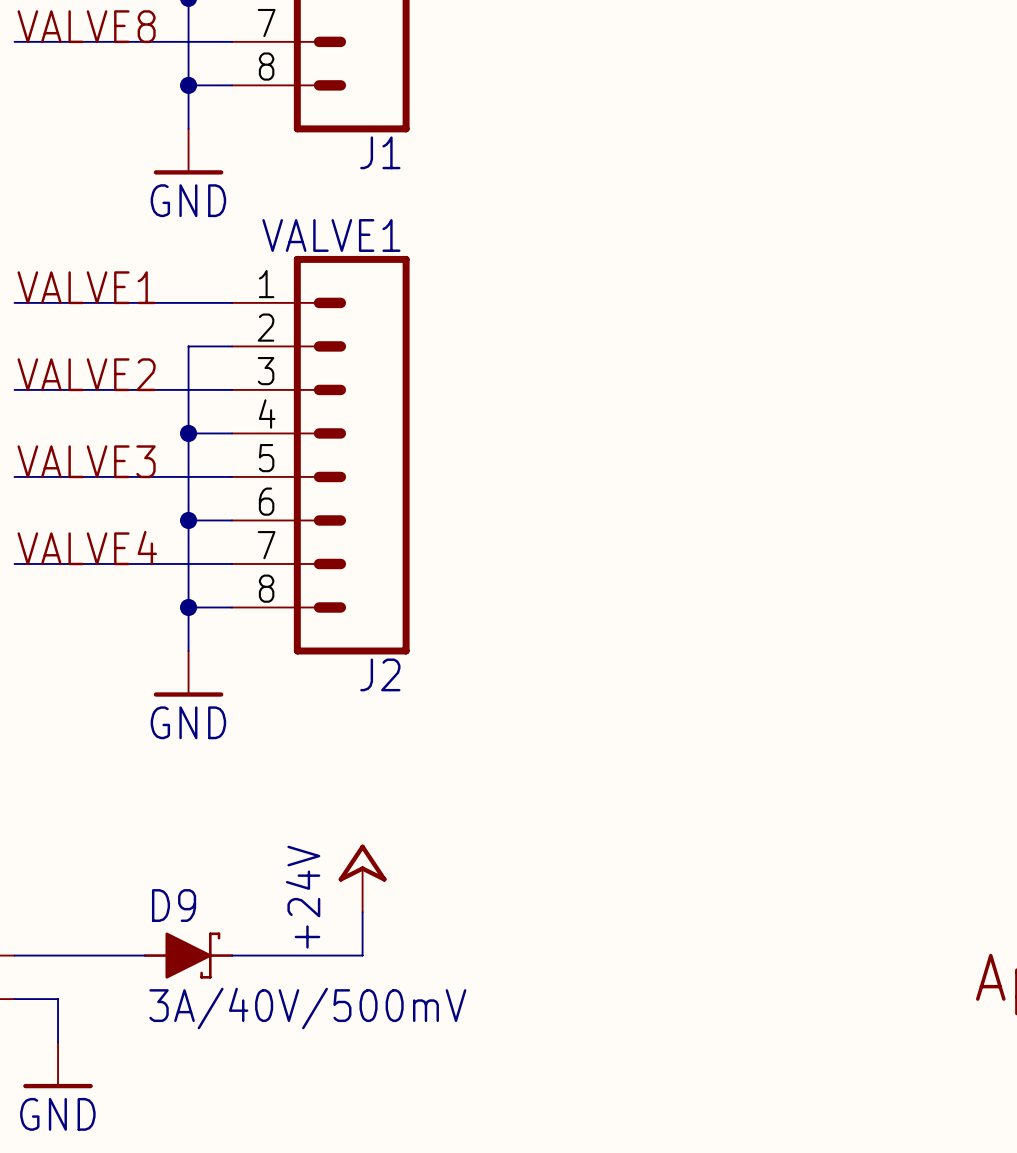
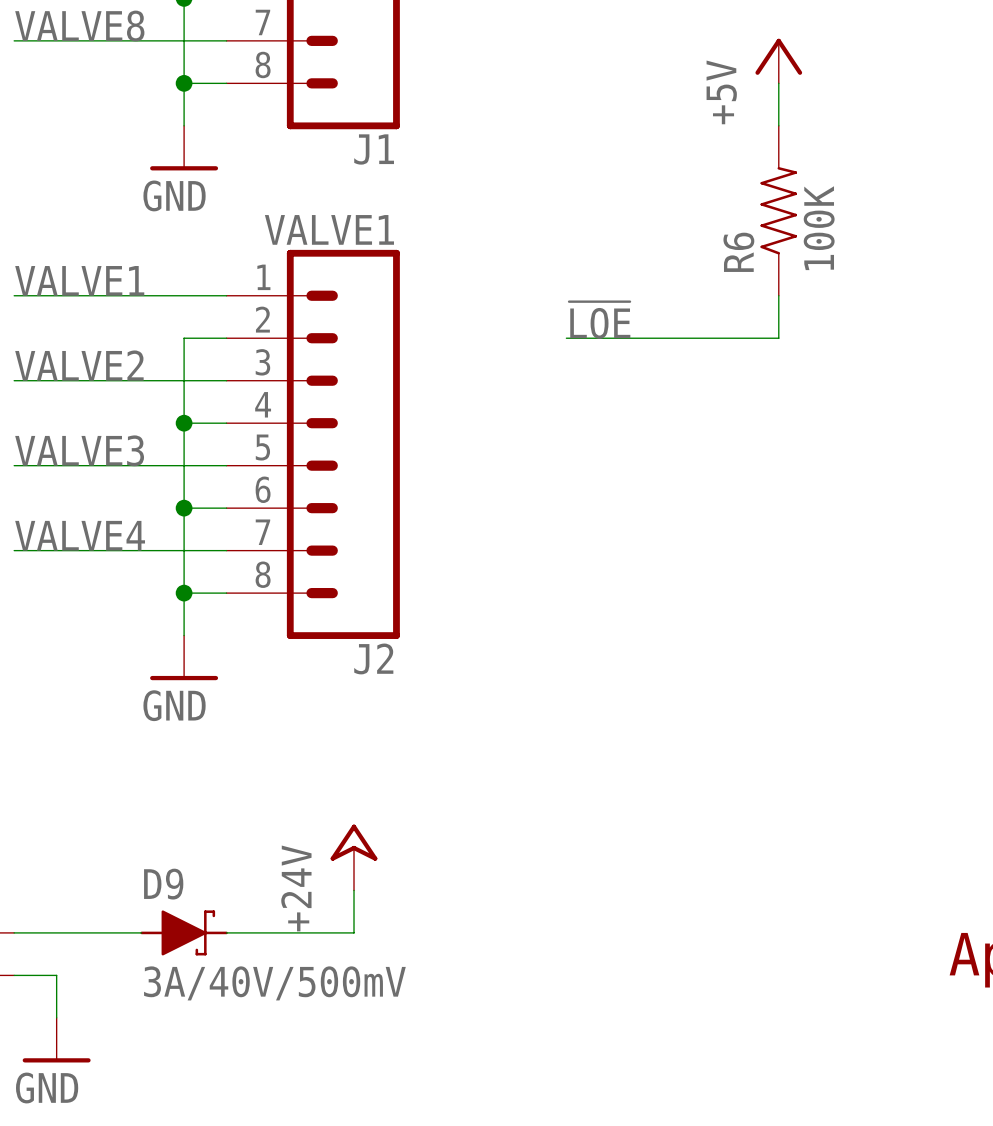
power symbol: none -> +5V (778, 61)
wire: none -> (778, 83) (778, 125)
R6: none -> 100K (778, 210)
wire: none -> (778, 295) (778, 338) (566, 338)
label: none -> ~{LOE} (599, 320)

